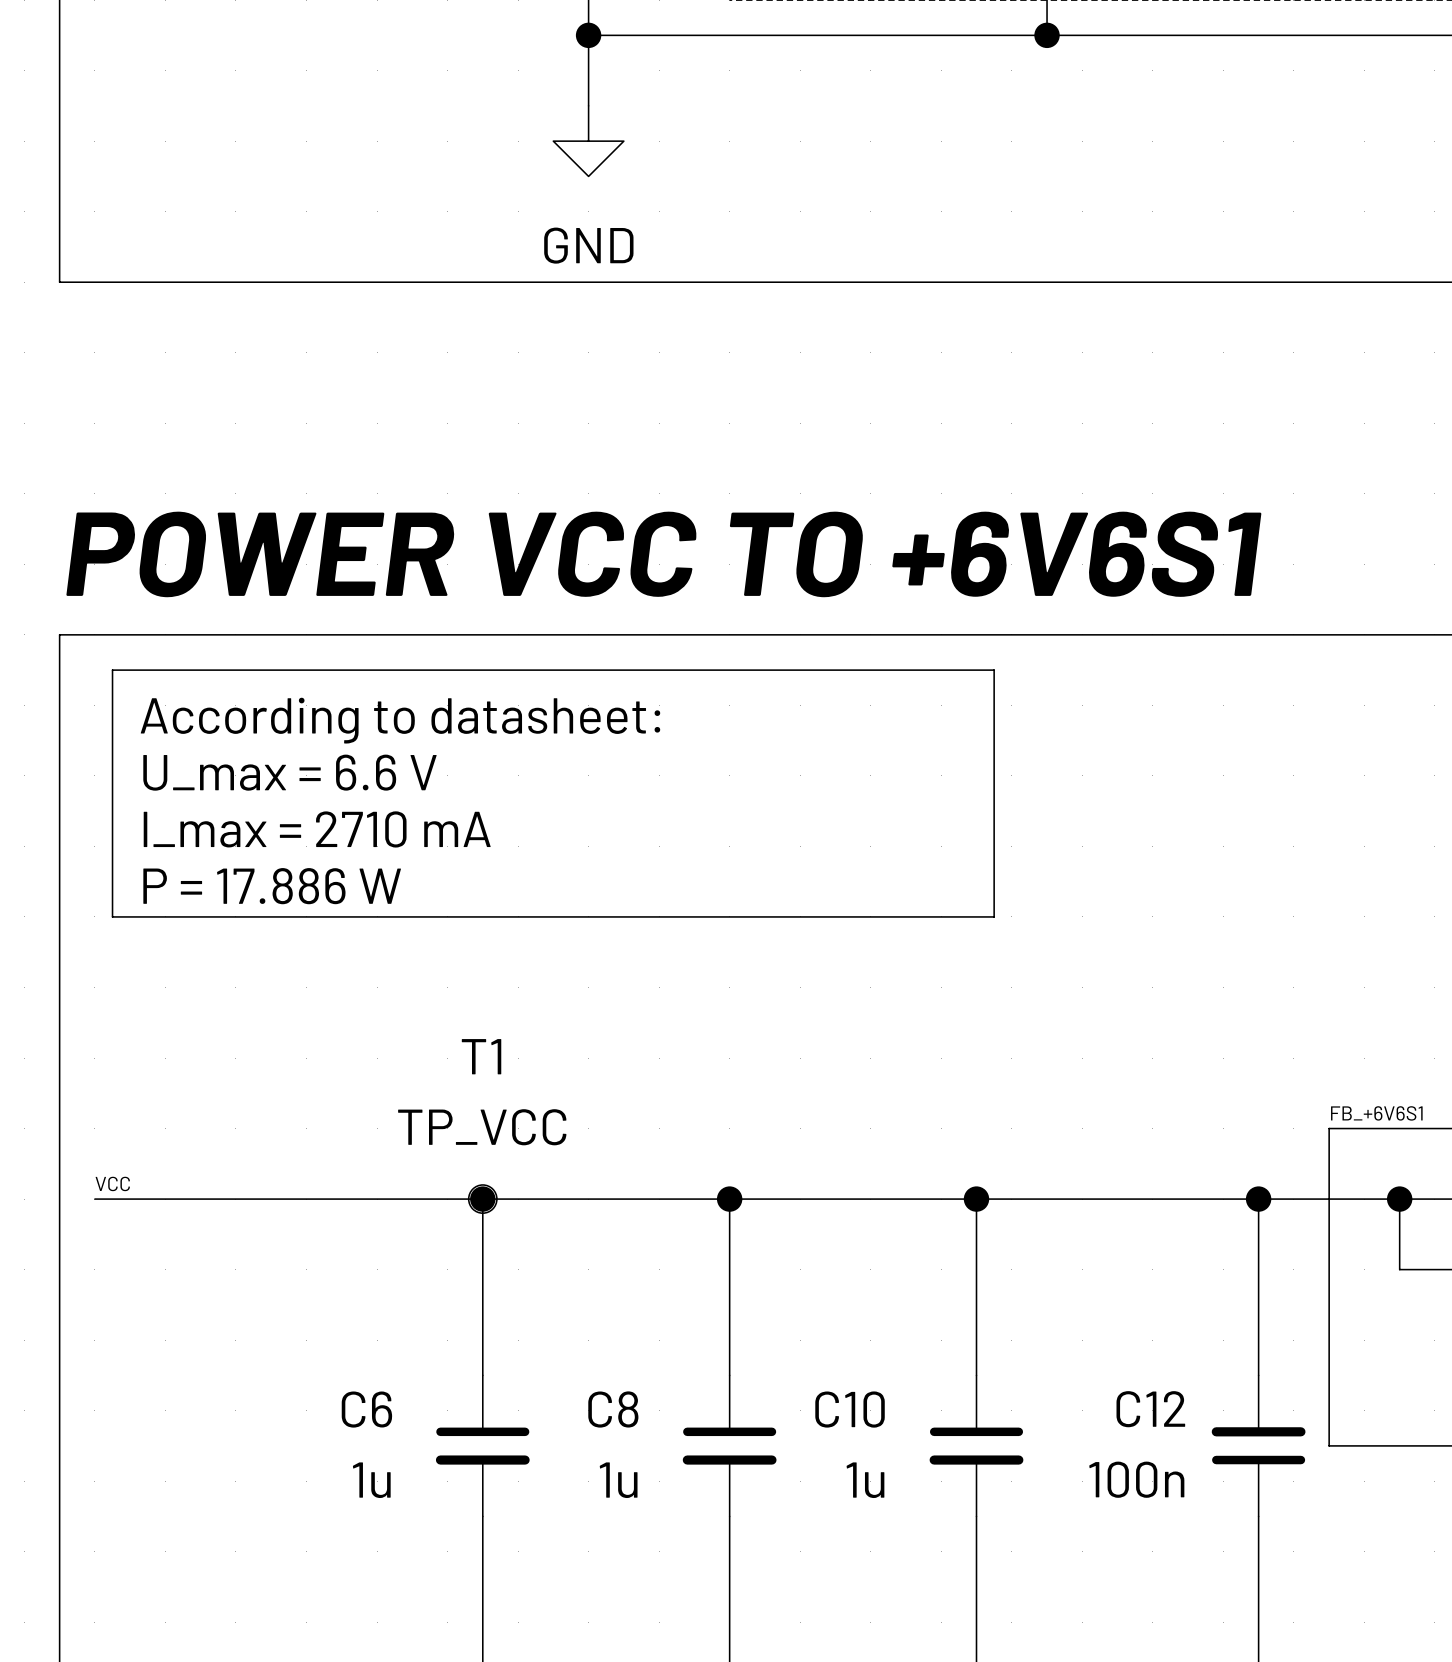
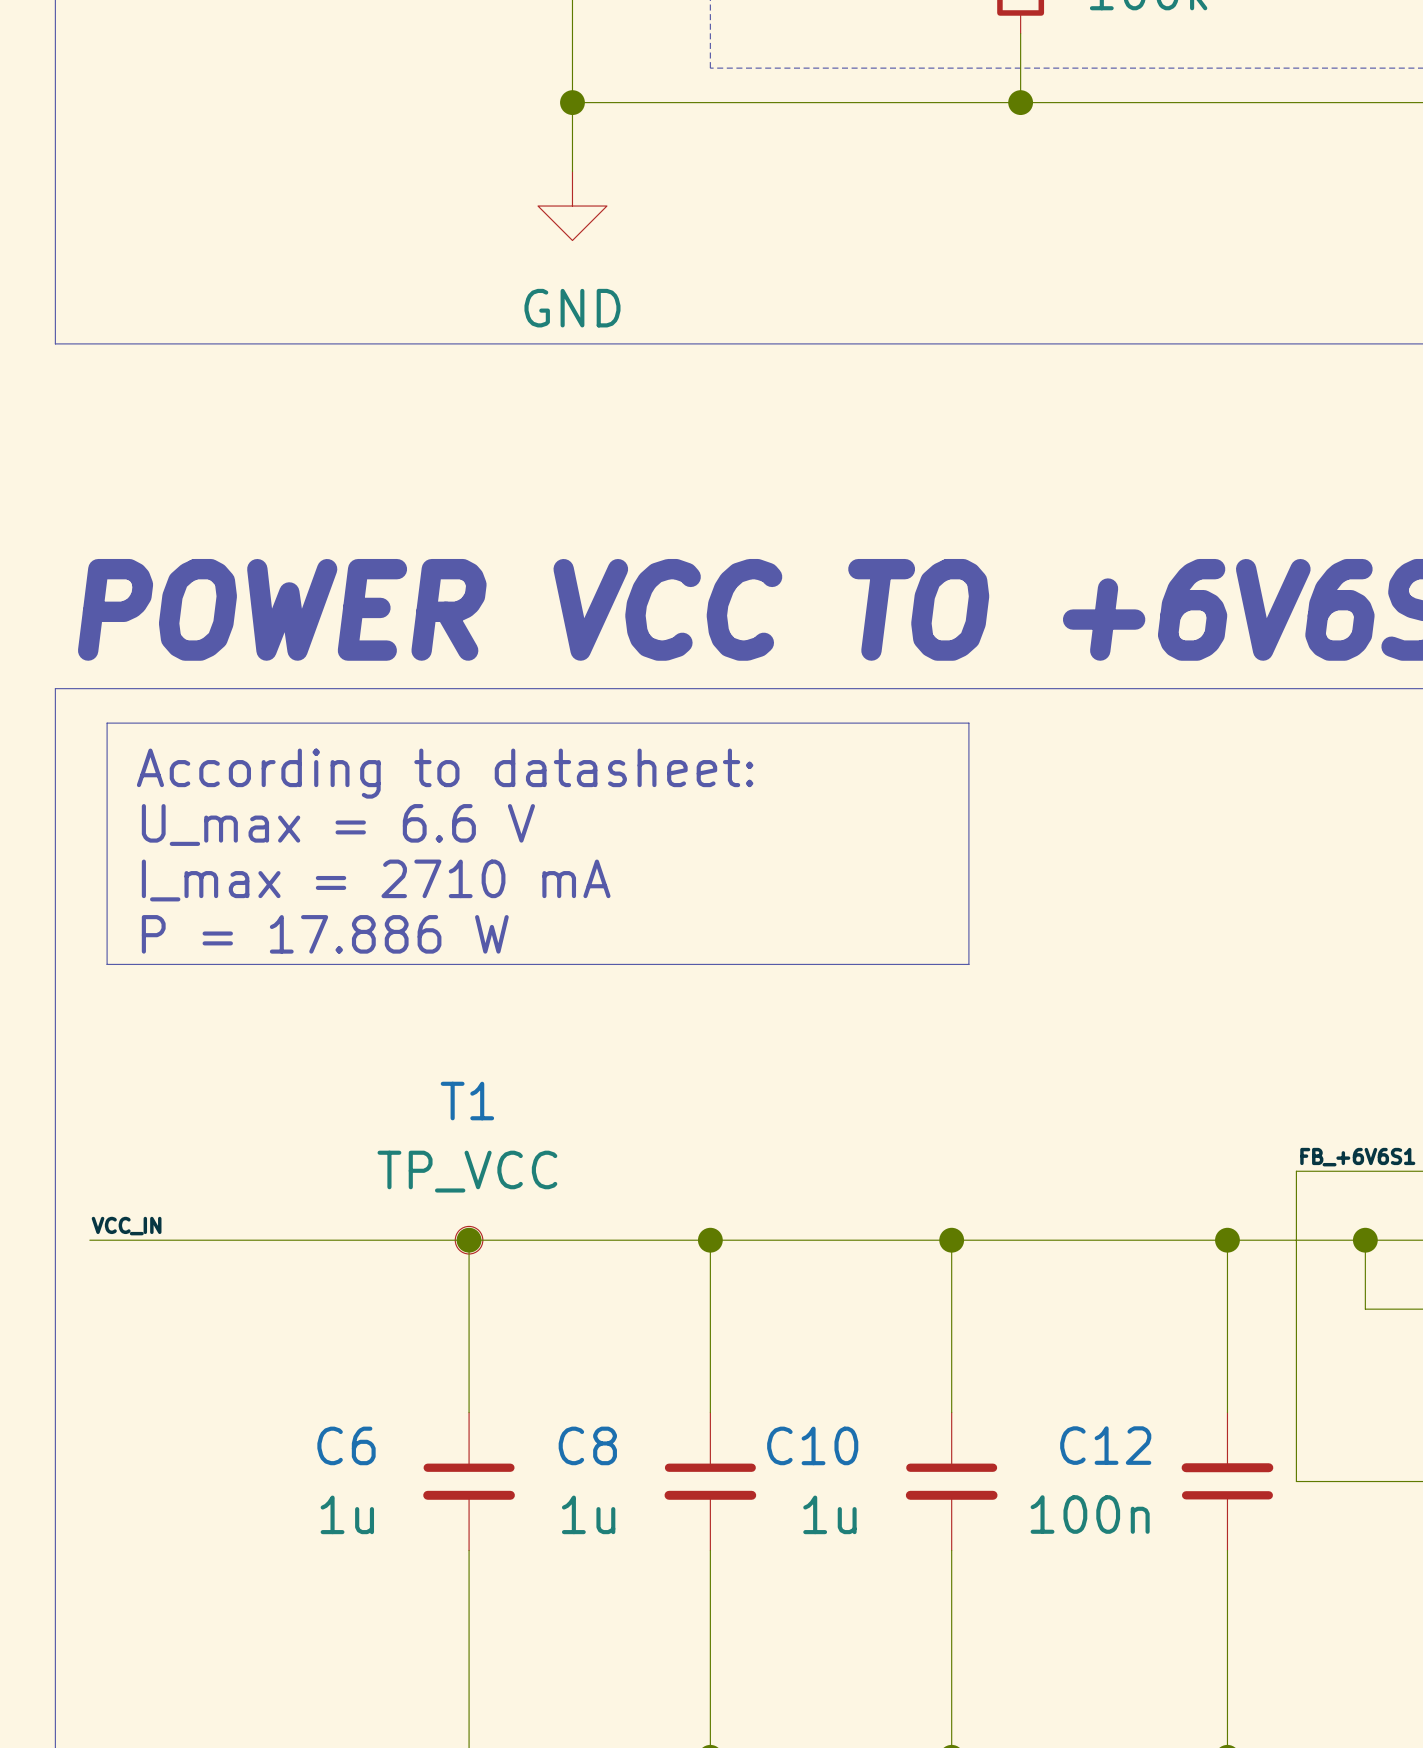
label: VCC (112, 1183) -> VCC_IN (126, 1226)

